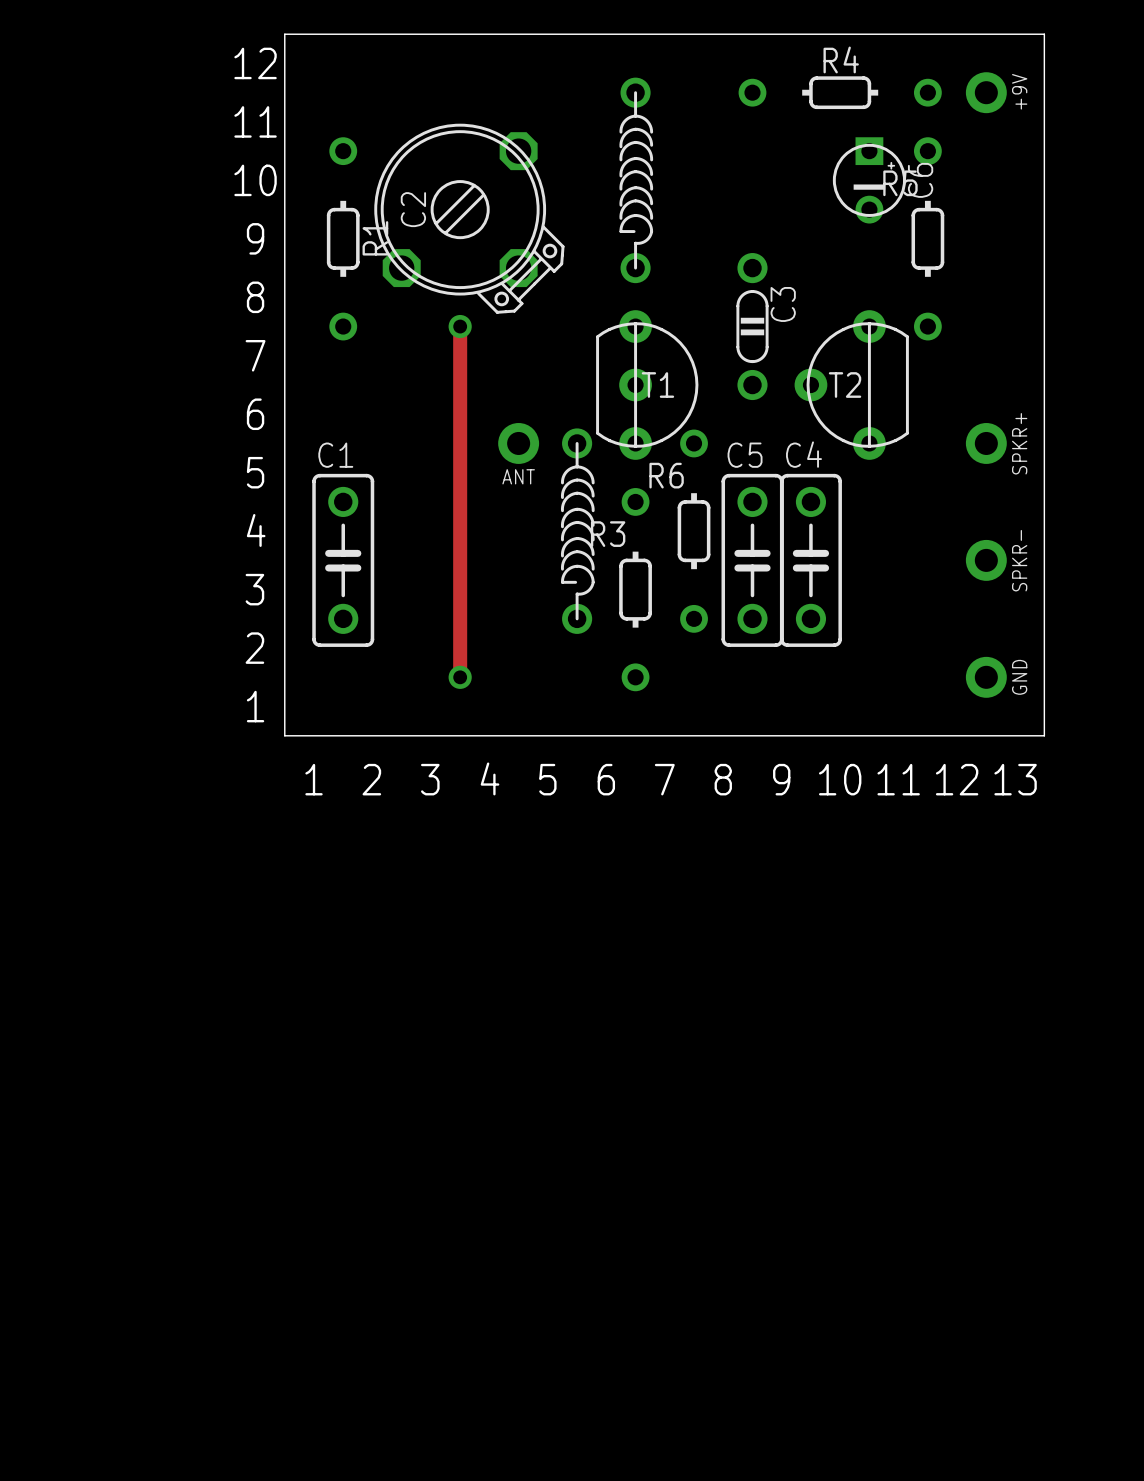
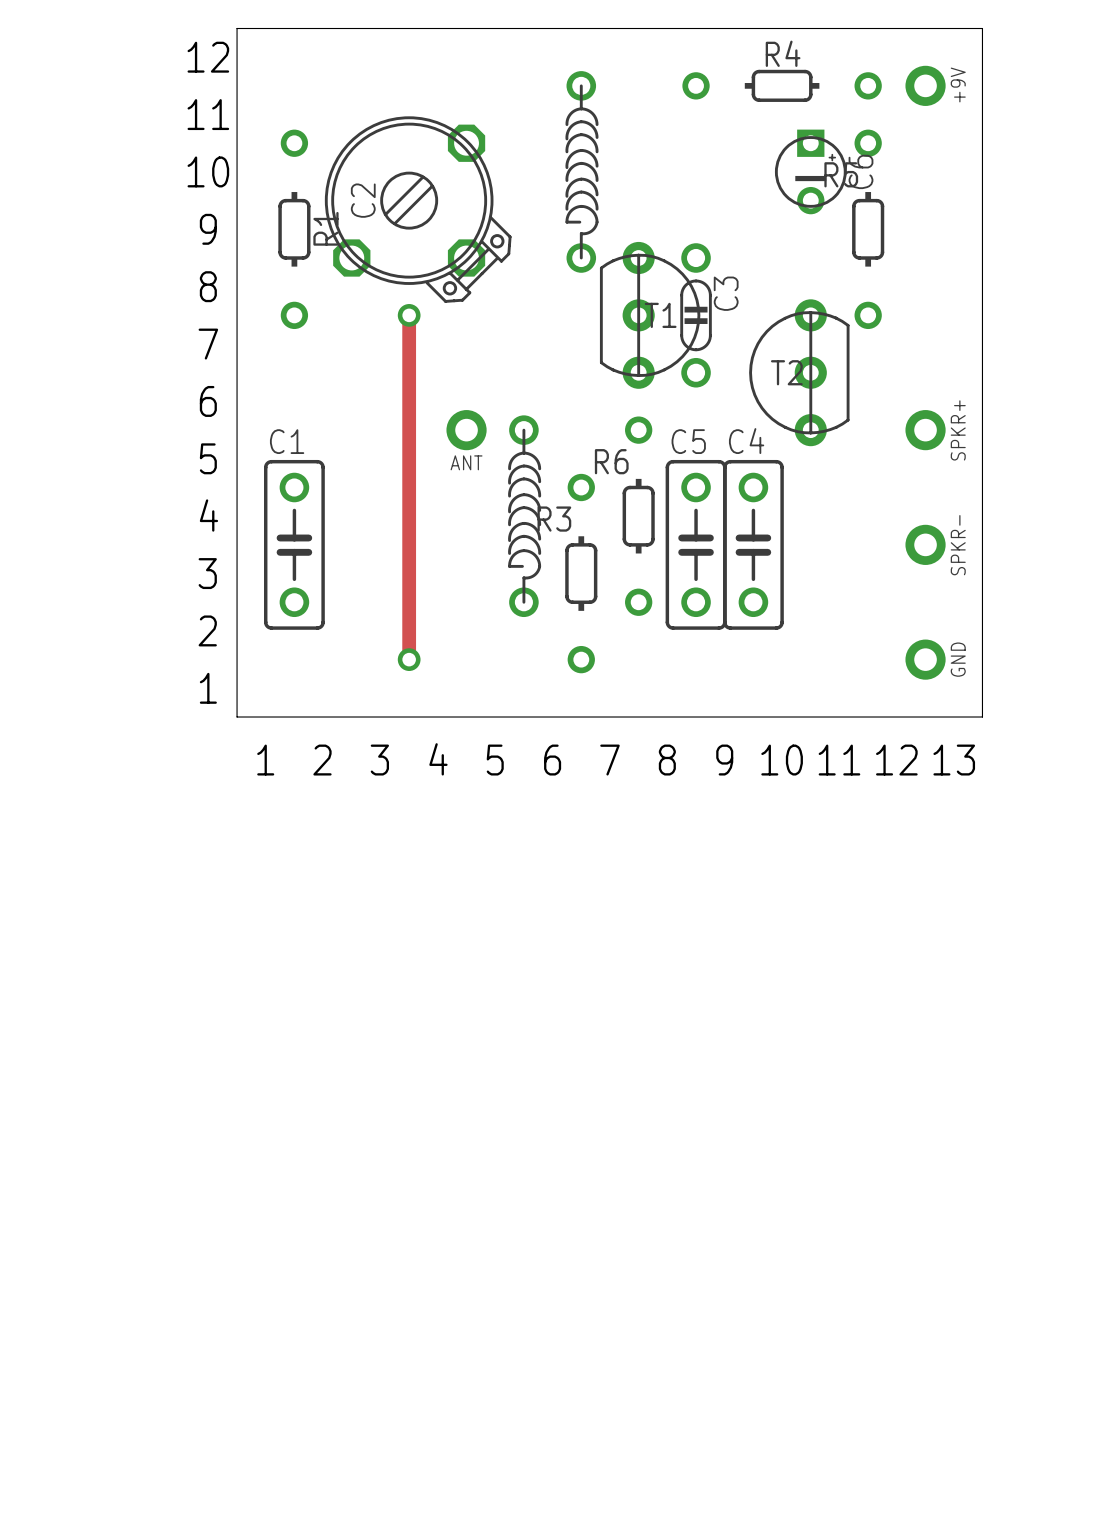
T2 footprint: [794, 310, 909, 460] -> [749, 299, 850, 447]
T1 position: (647, 385) -> (650, 315)

